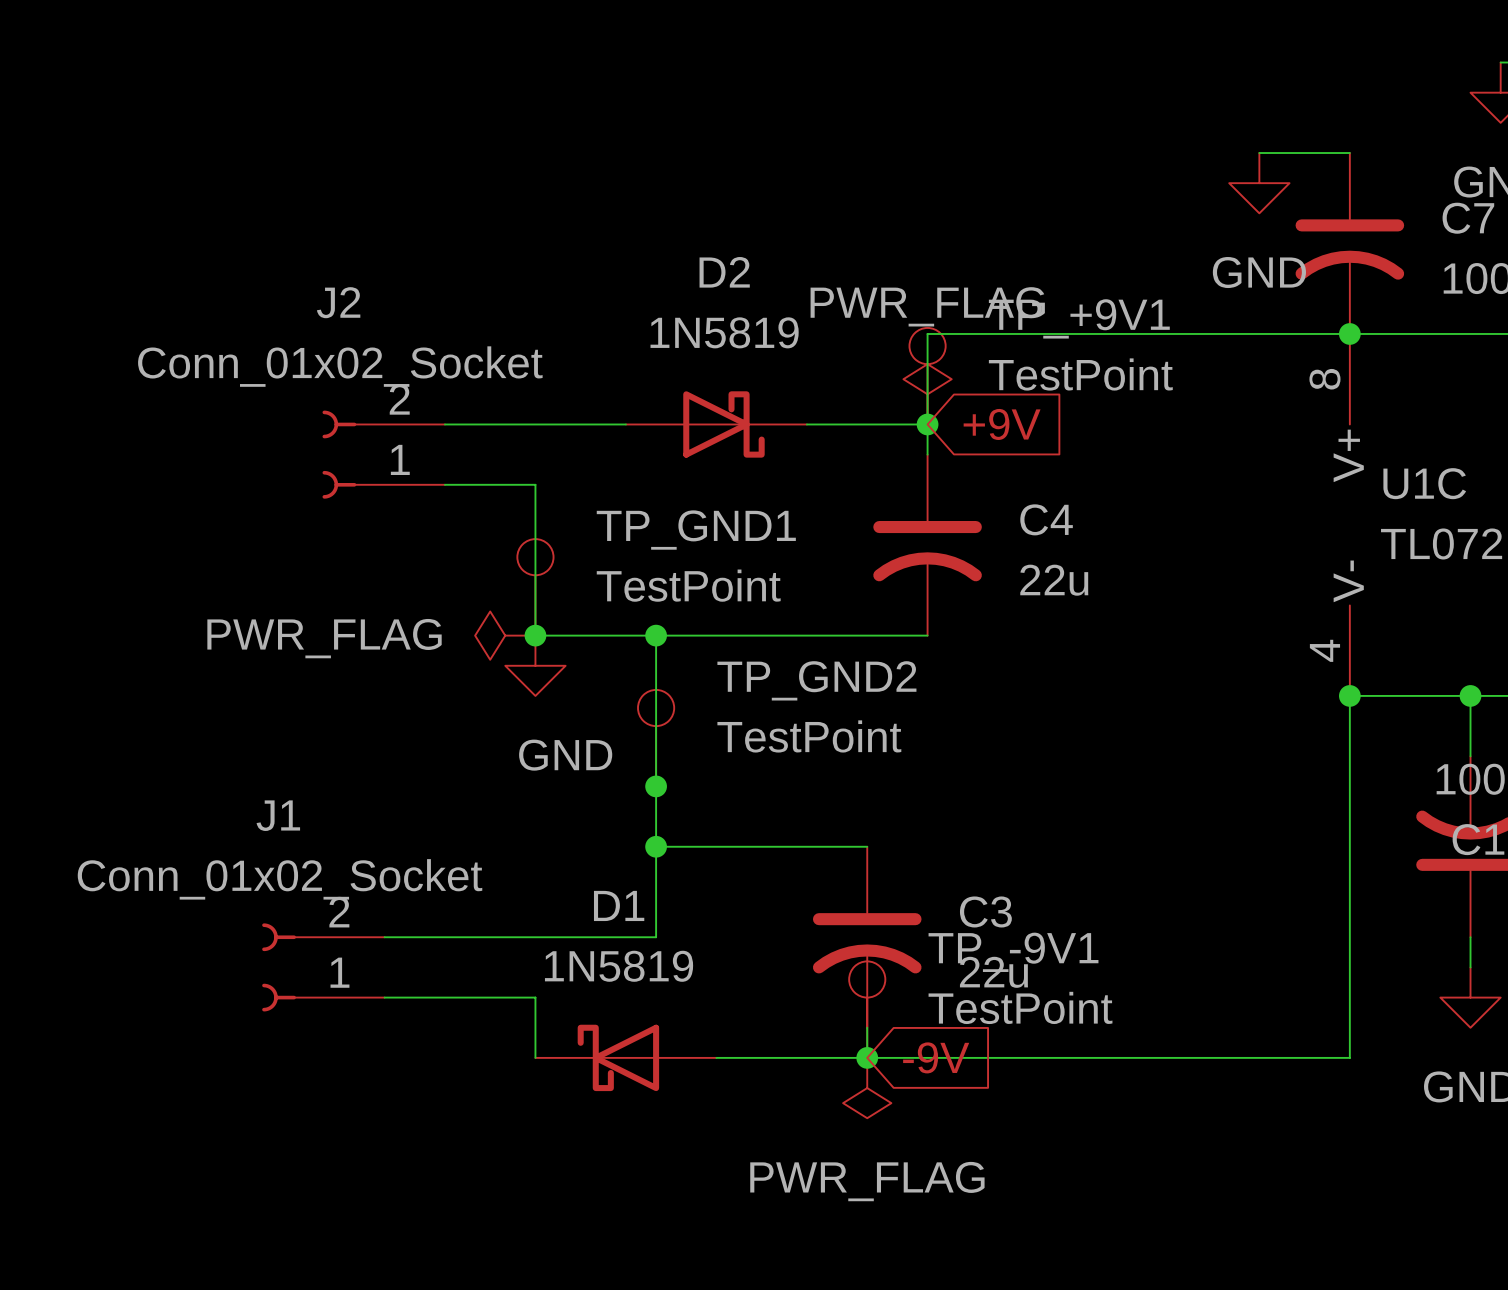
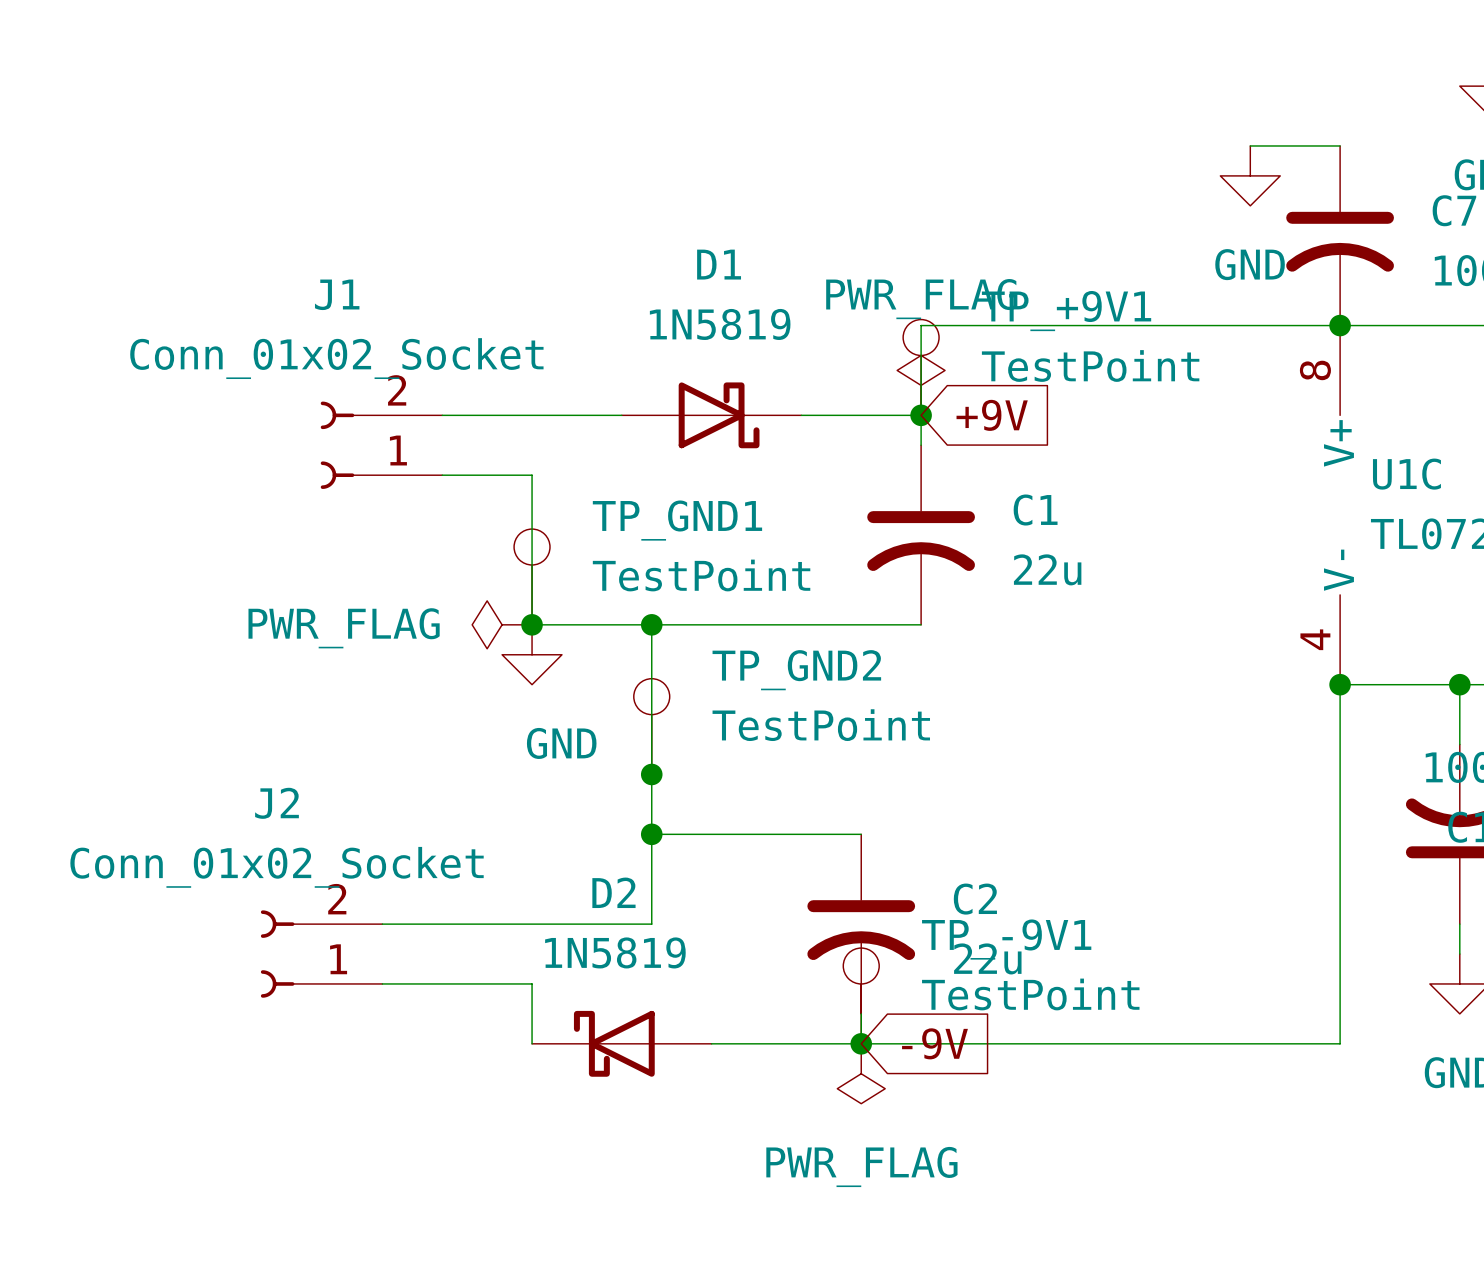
D2 name: D2 (724, 272) -> D1 (719, 264)
J2 name: J2 (338, 302) -> J1 (337, 294)
C4 name: C4 (1046, 519) -> C1 (1035, 510)
J1 name: J1 (278, 815) -> J2 (276, 803)
D1 name: D1 (619, 905) -> D2 (613, 892)
C3 name: C3 (985, 911) -> C2 (975, 899)

